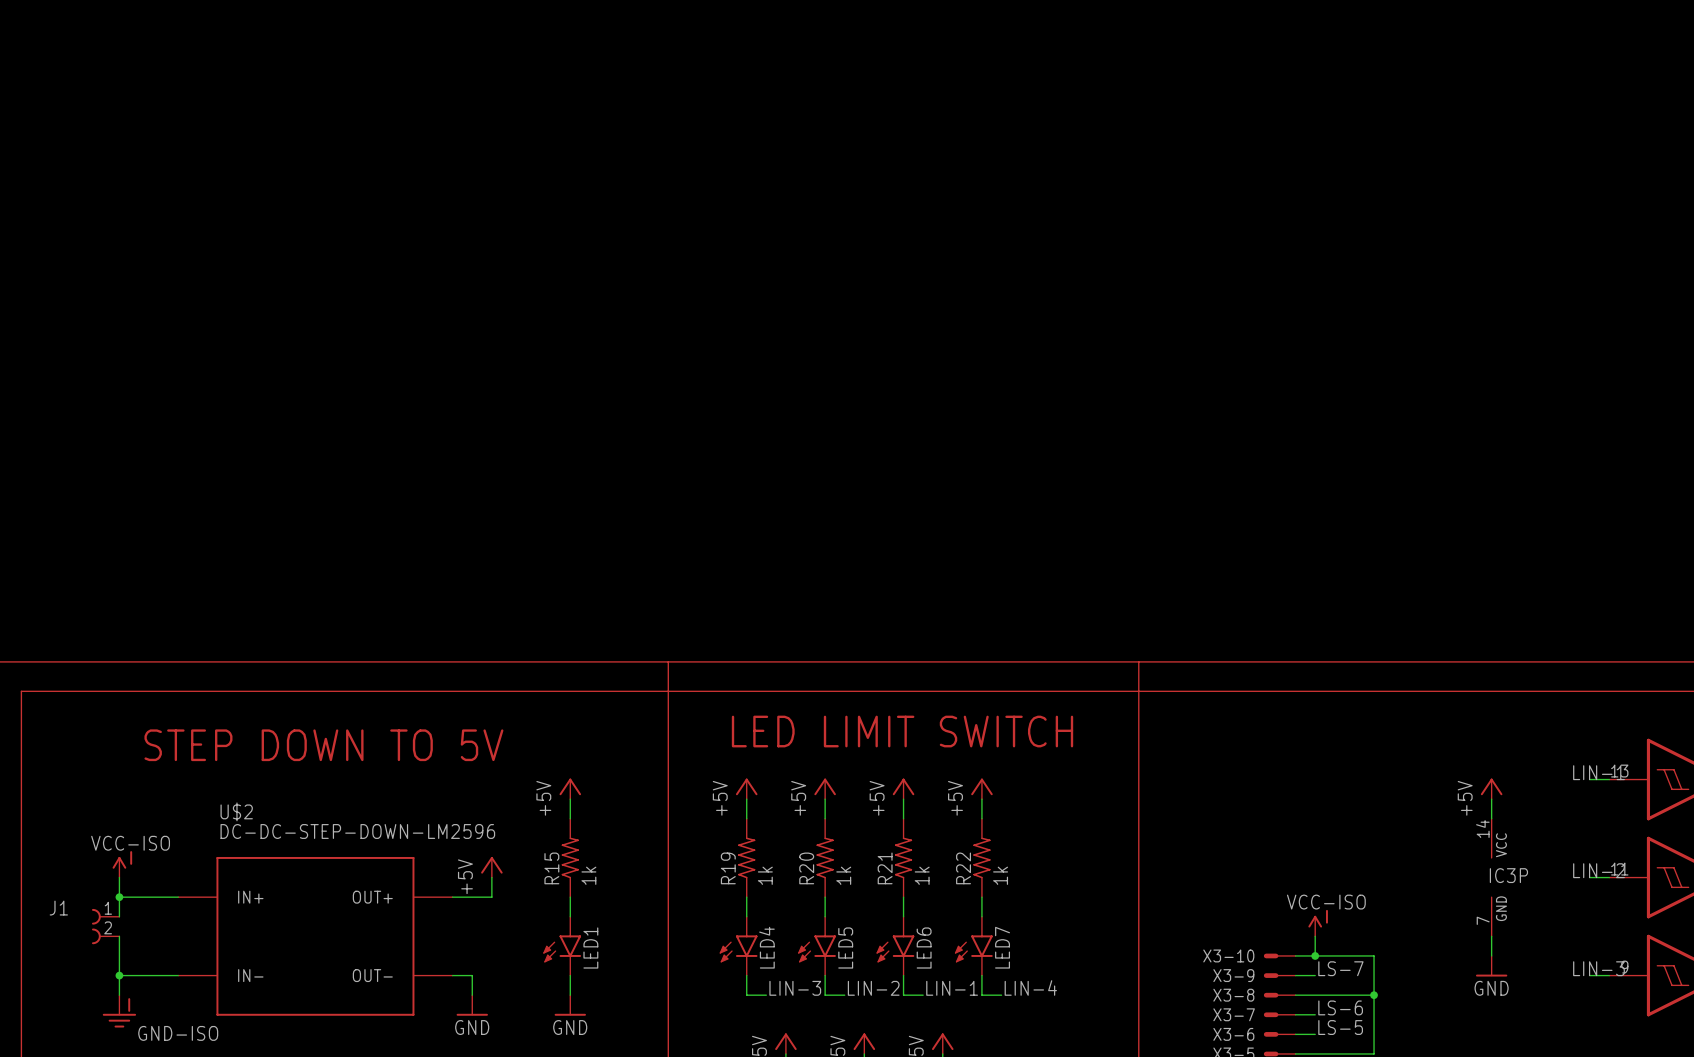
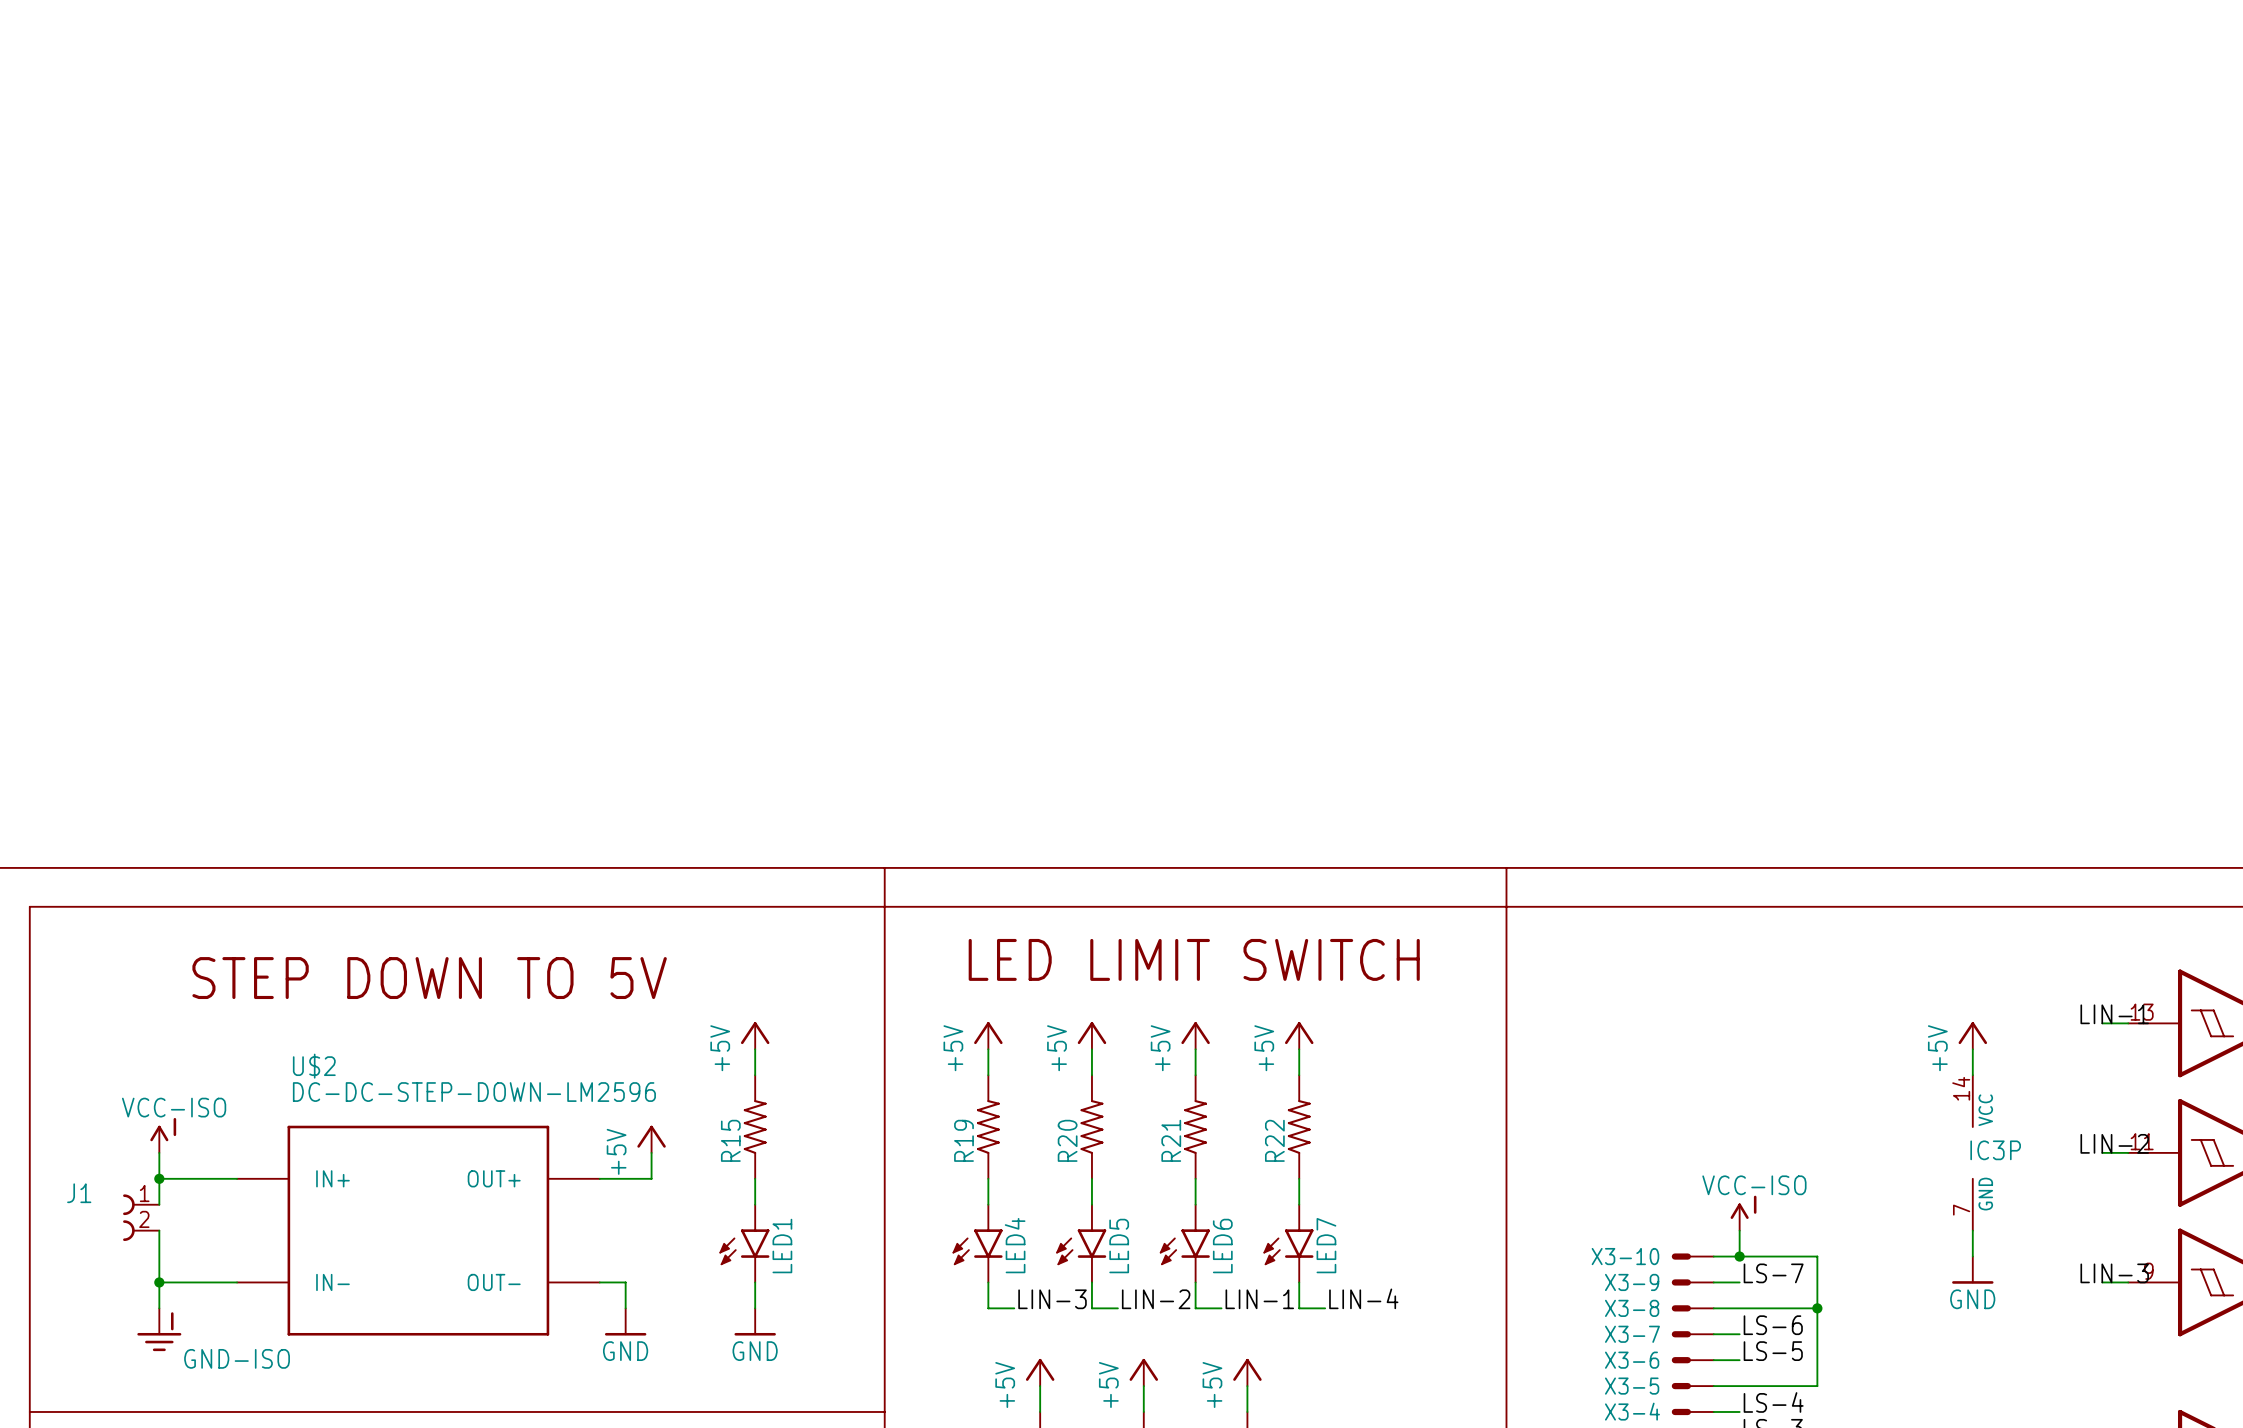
R15 value: 1k (588, 875) -> none
R19 value: 1k (765, 875) -> none
R20 value: 1k (843, 875) -> none
R21 value: 1k (922, 875) -> none
R22 value: 1k (1000, 875) -> none

